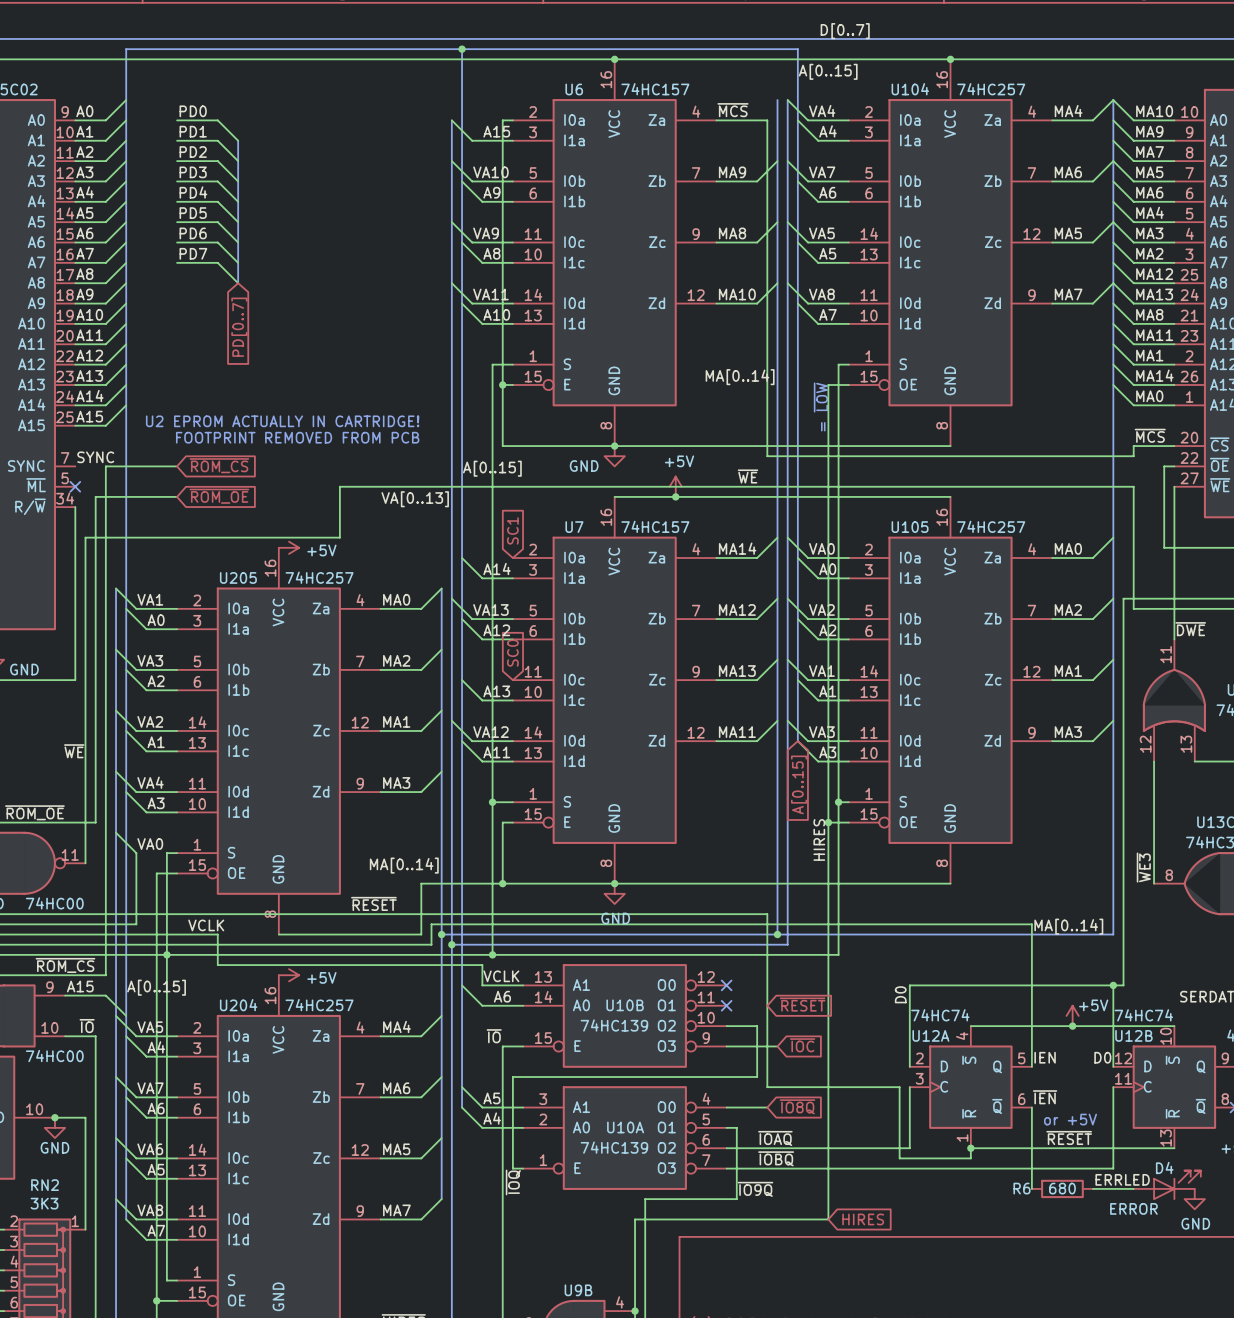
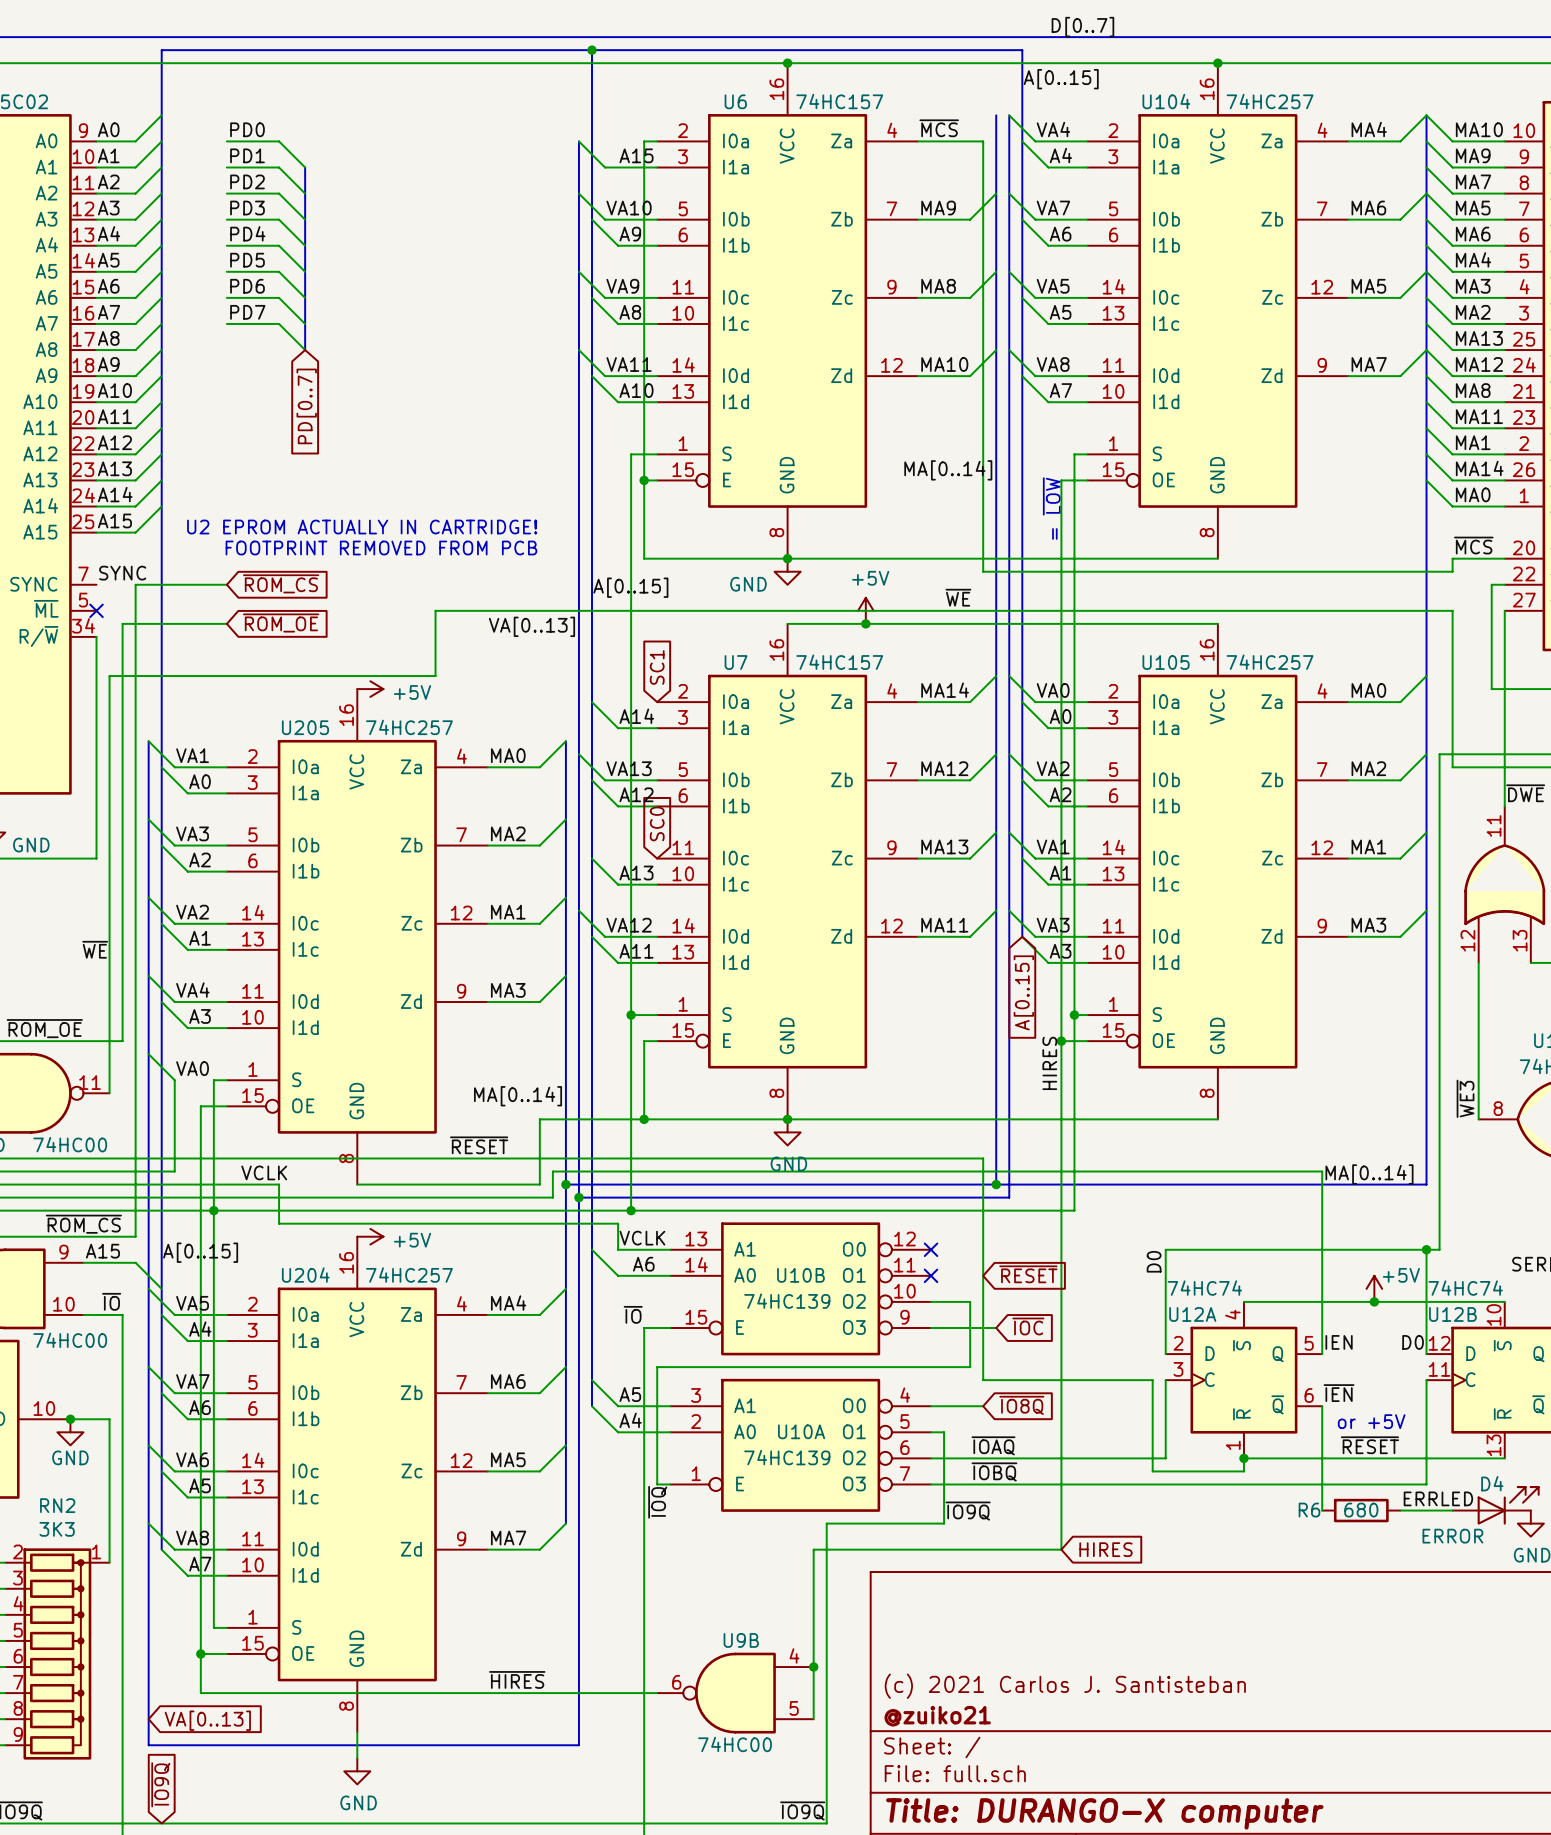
label: MA12 (1154, 274) -> MA13 (1479, 338)
label: MA13 (1154, 294) -> MA12 (1479, 364)

